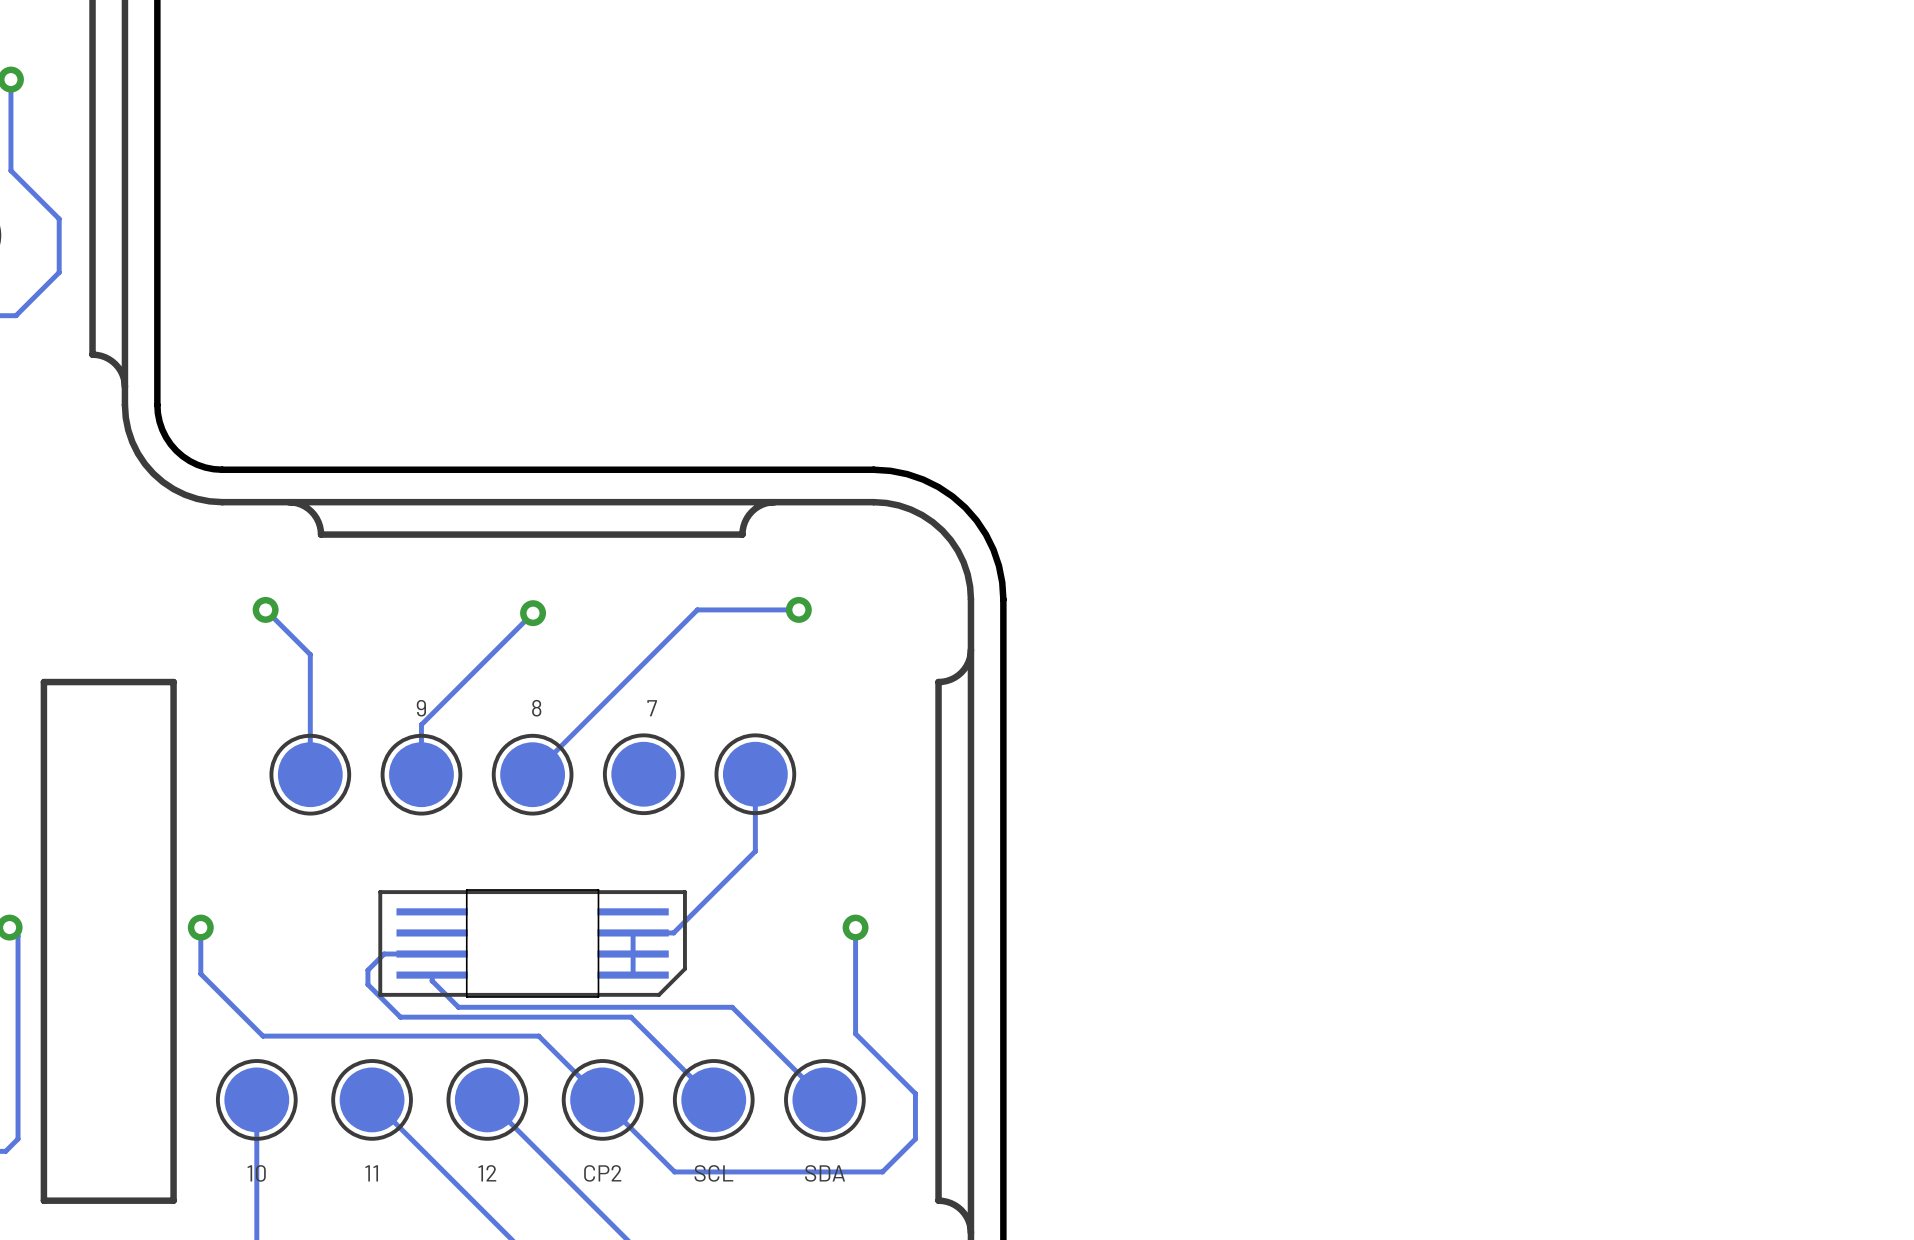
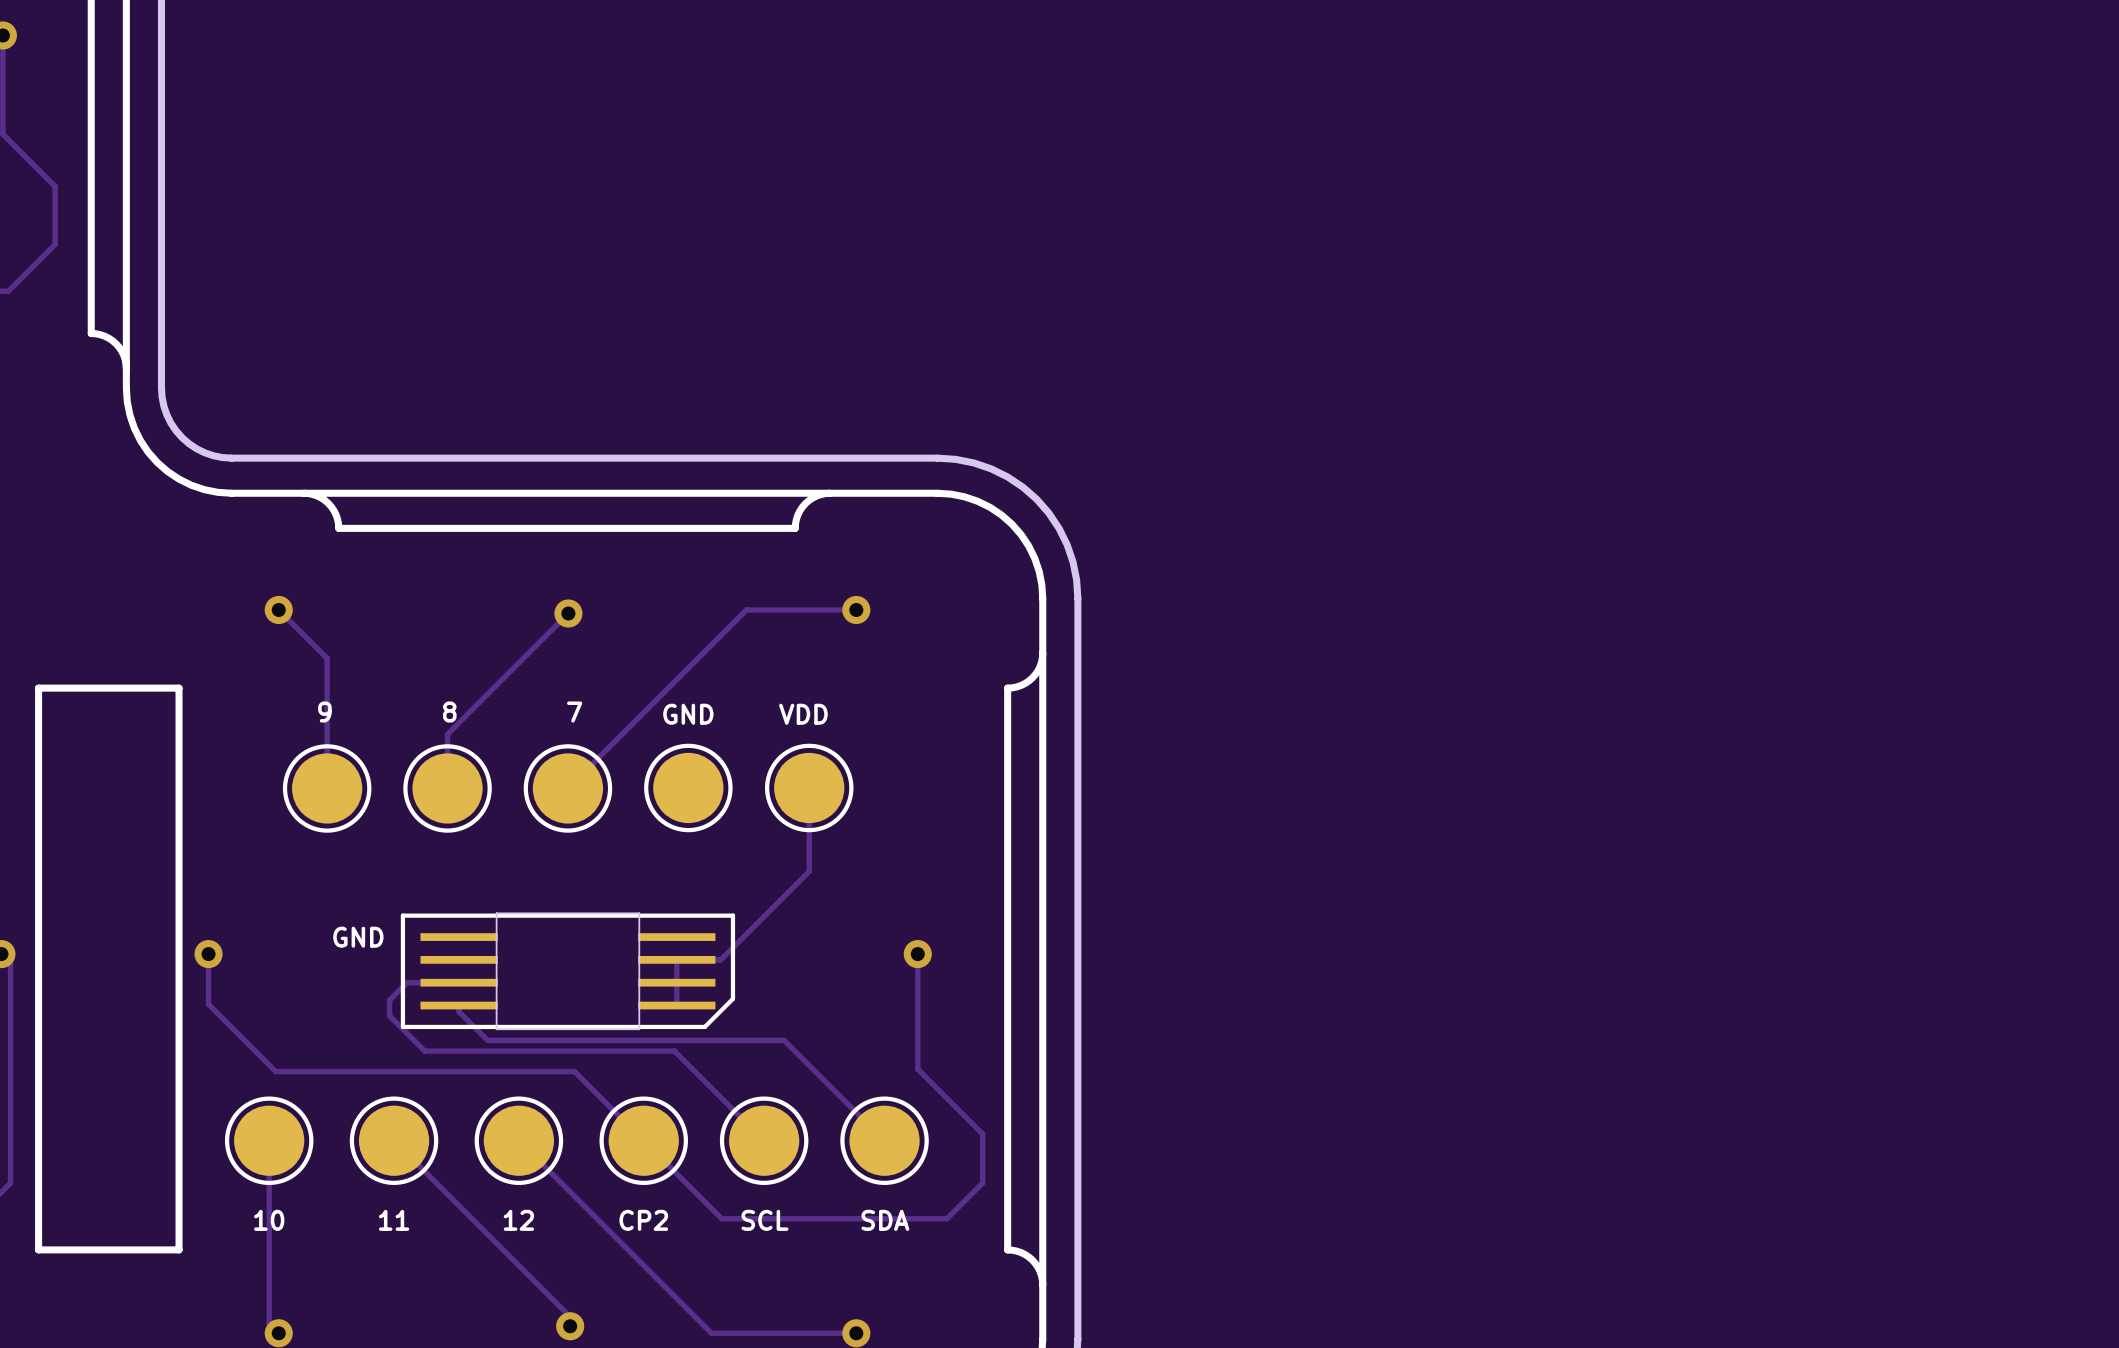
text: none -> 9 (324, 712)
text: none -> VDD (803, 714)
text: 9 (421, 708) -> 8 (449, 712)
text: 8 (536, 708) -> 7 (574, 712)
text: 7 (652, 708) -> GND (688, 714)
text: none -> GND (358, 937)

